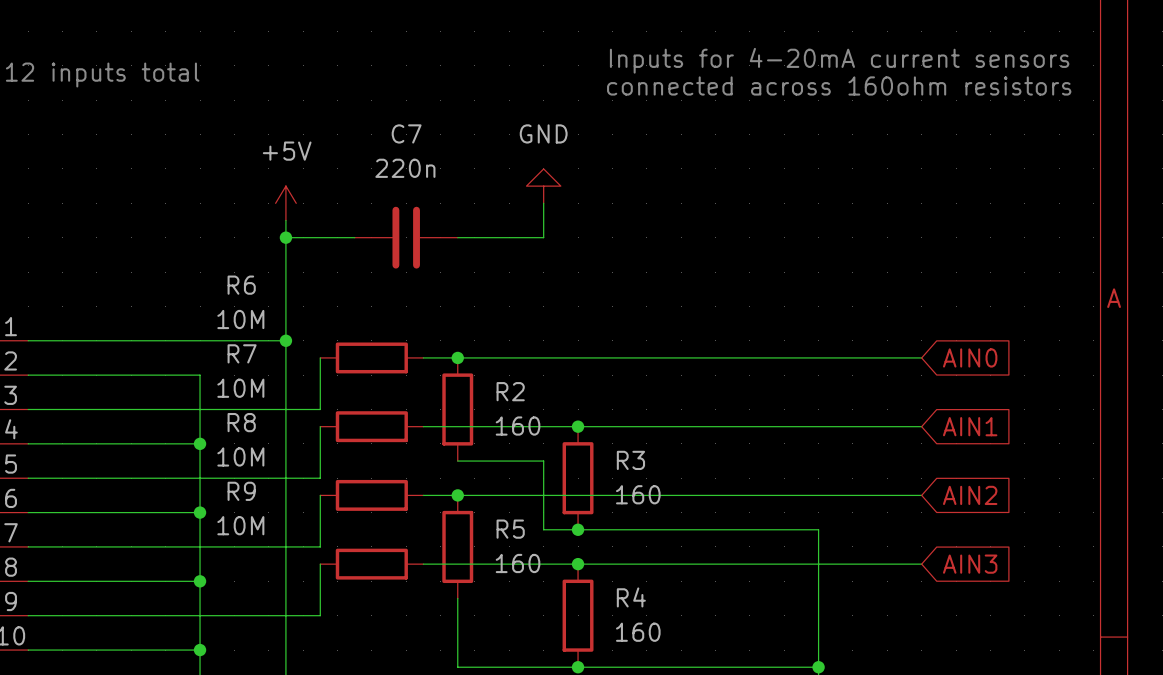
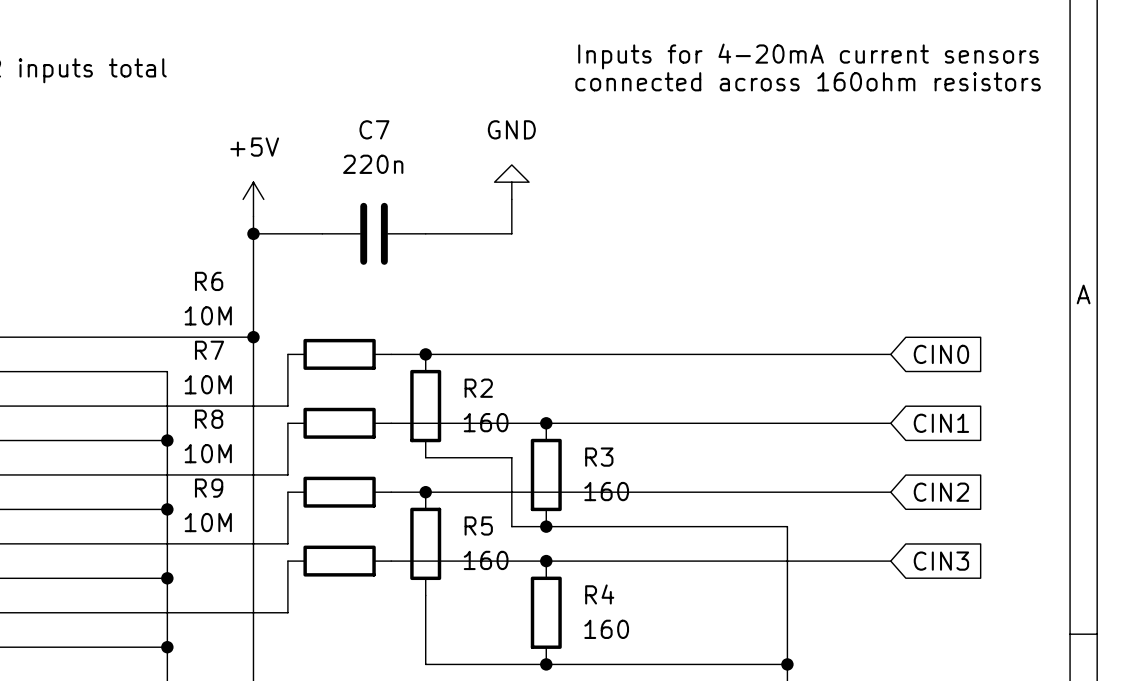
global label: AIN0 (970, 357) -> CIN0 (941, 354)
global label: AIN1 (970, 426) -> CIN1 (941, 423)
global label: AIN2 (970, 495) -> CIN2 (941, 492)
global label: AIN3 (970, 564) -> CIN3 (941, 561)

